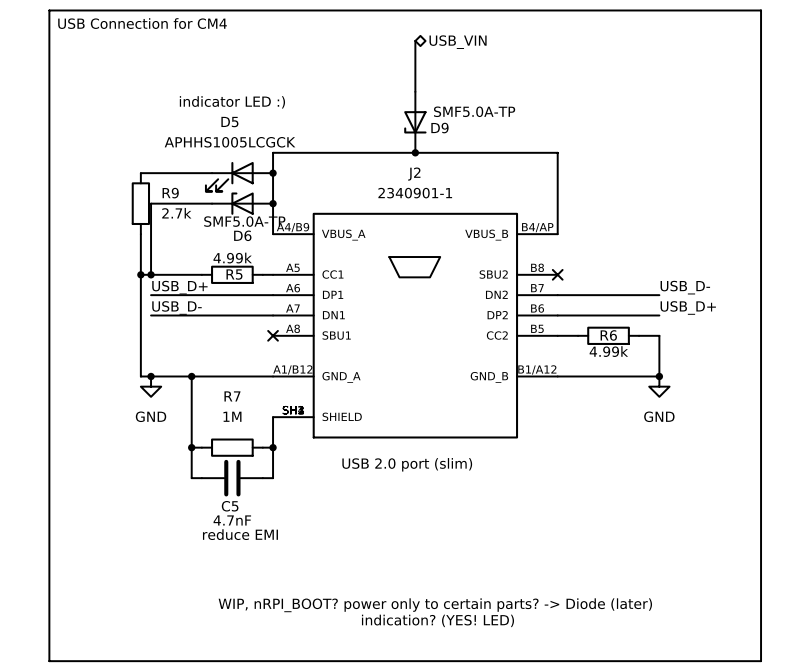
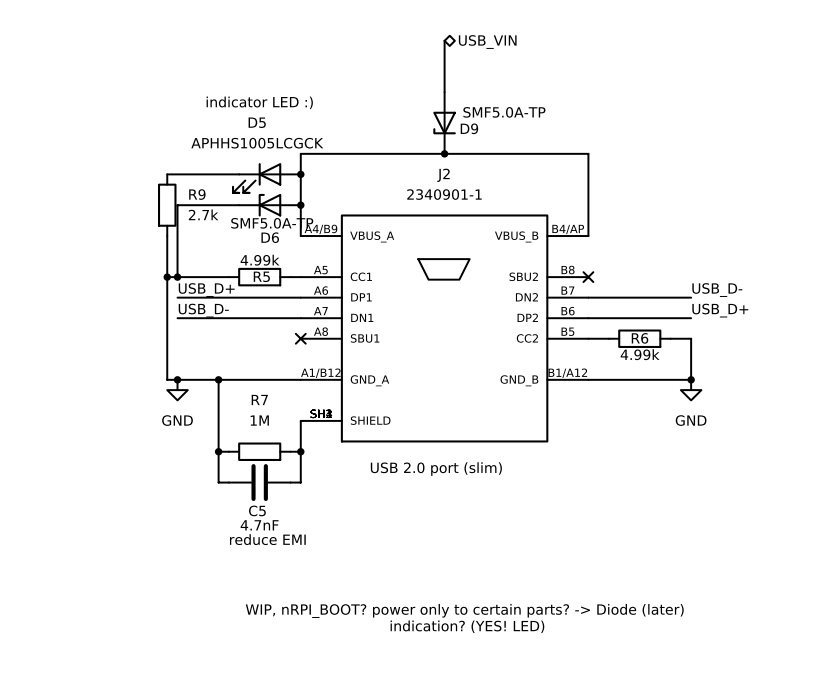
line: (49, 10) (761, 10) (761, 661) (49, 661) (49, 10) -> none
text: USB Connection for CM4 (142, 23) -> none

